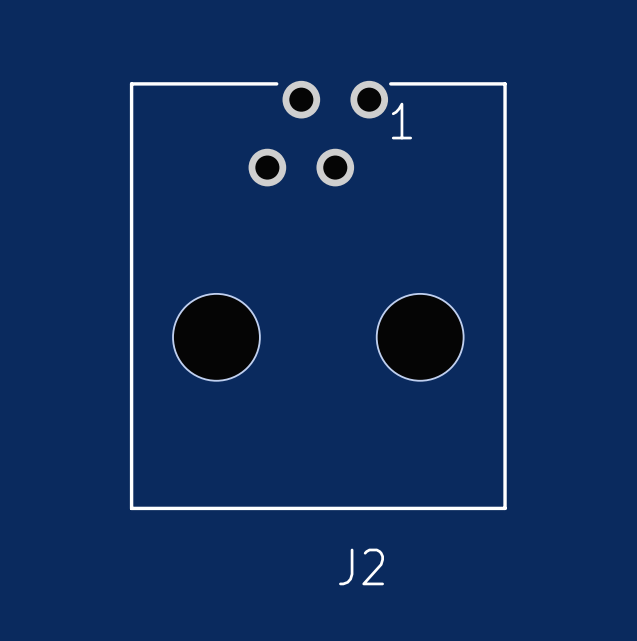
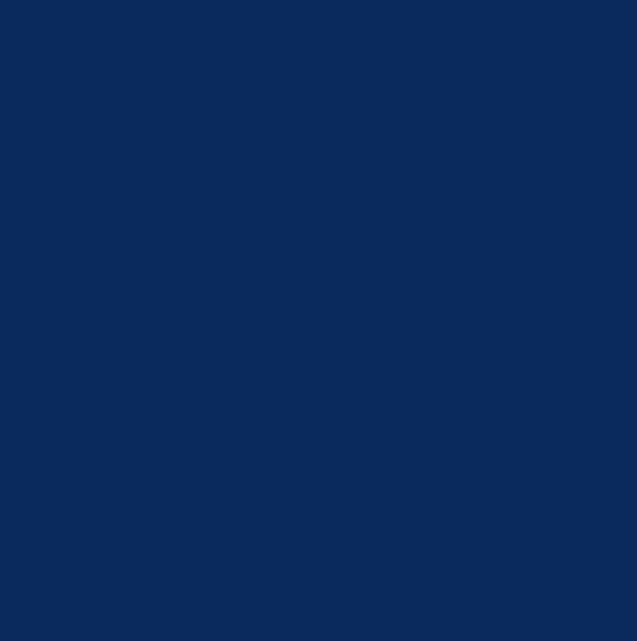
J2: (318, 295) -> none

